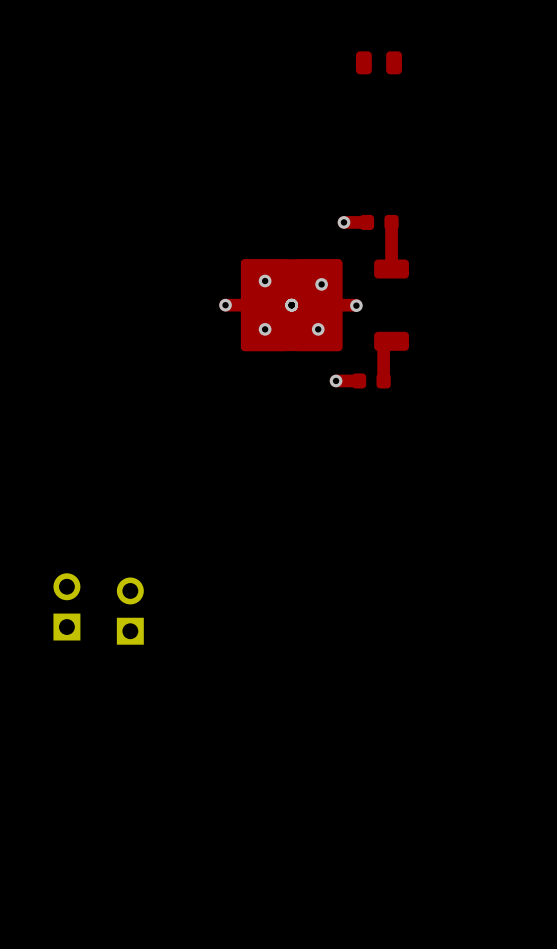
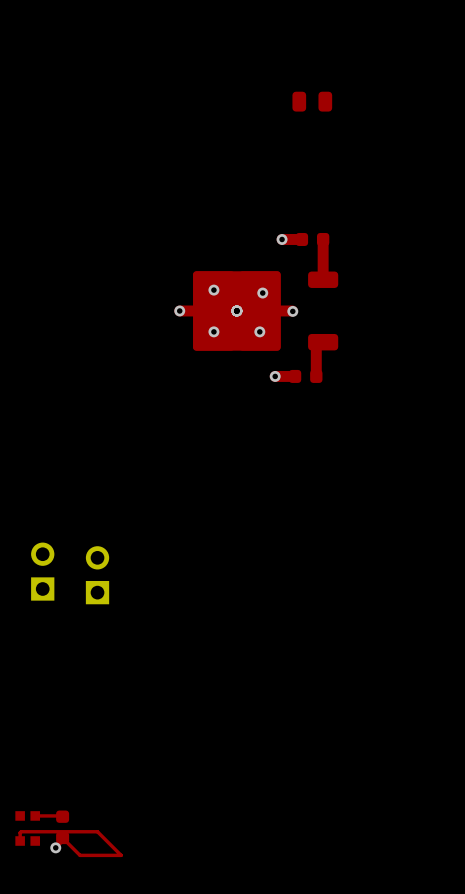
top track: none -> (35, 815) (62, 816)
part: none -> (62, 827)
part: none -> (27, 828)
top track: none -> (20, 841) (21, 831) (97, 831) (121, 855) (80, 855) (62, 837) (62, 841) (55, 847)
via: none -> (55, 847)

